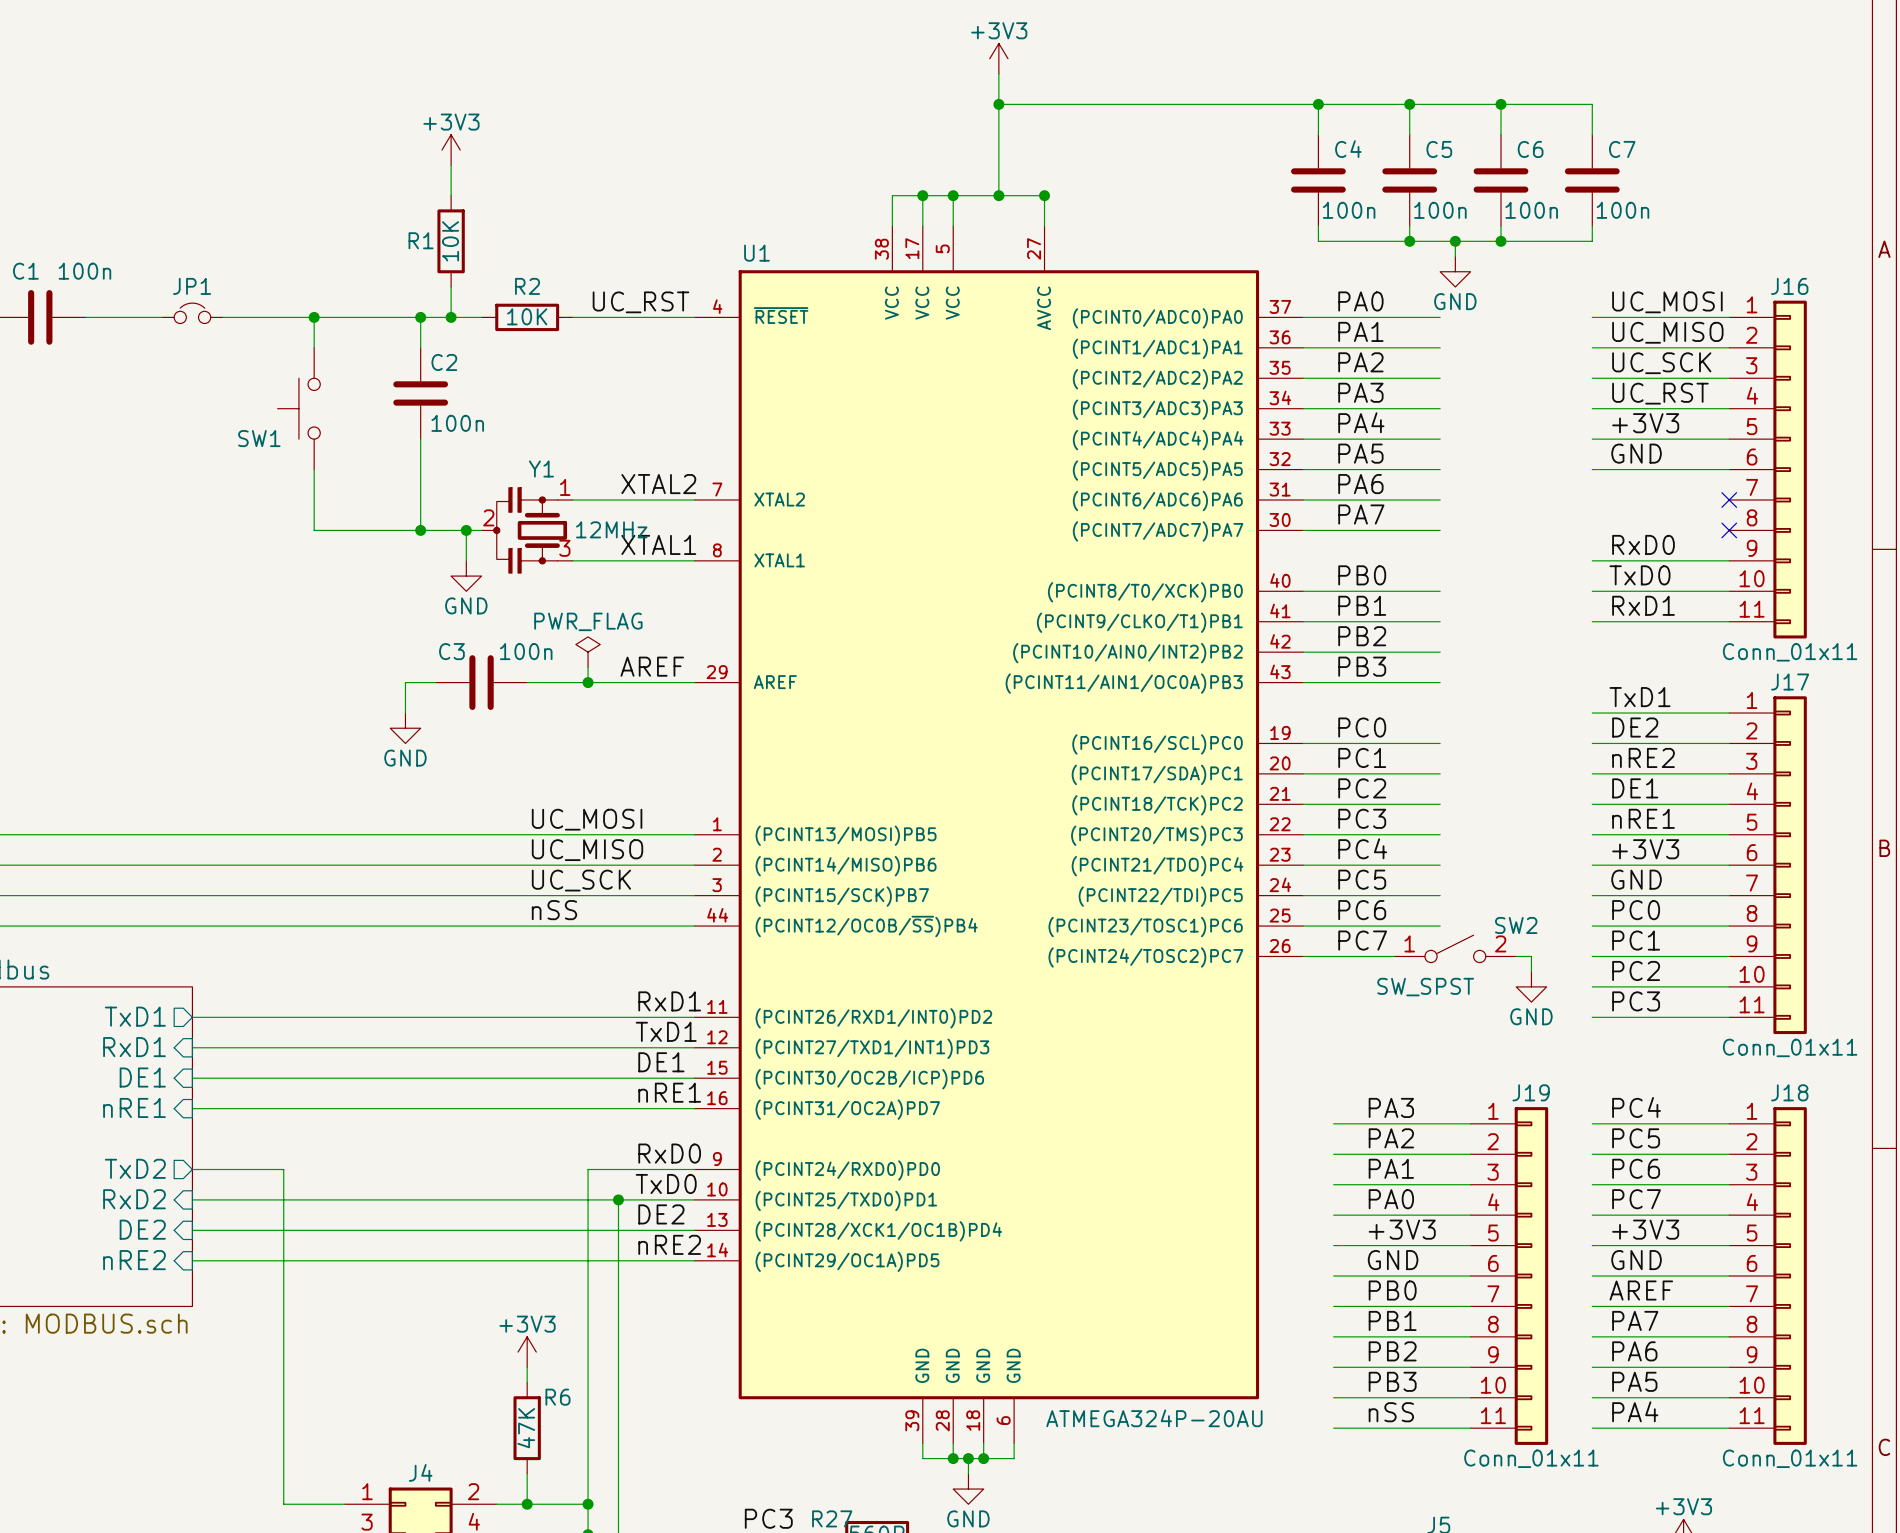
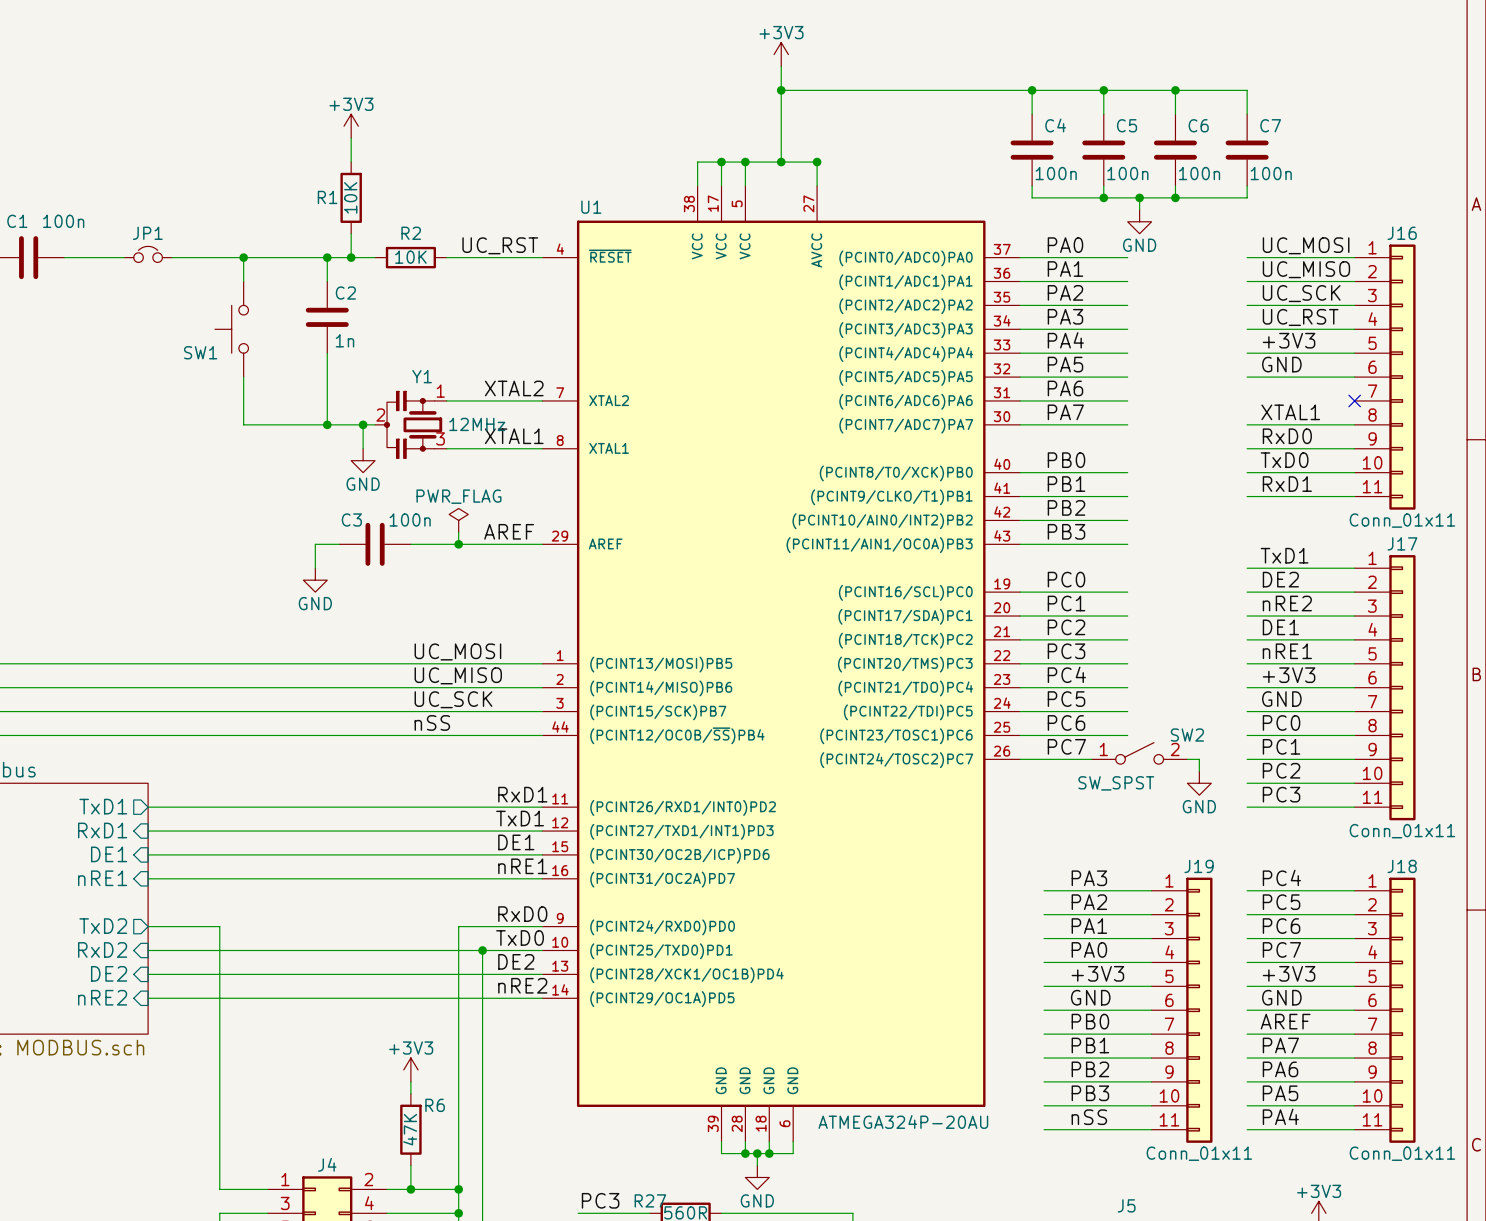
C2 value: 100n (457, 423) -> 1n (345, 340)
label: none -> XTAL1 (1290, 412)
wire: none -> (1247, 424) (1354, 424)
no-connect mark: (1729, 530) -> none

